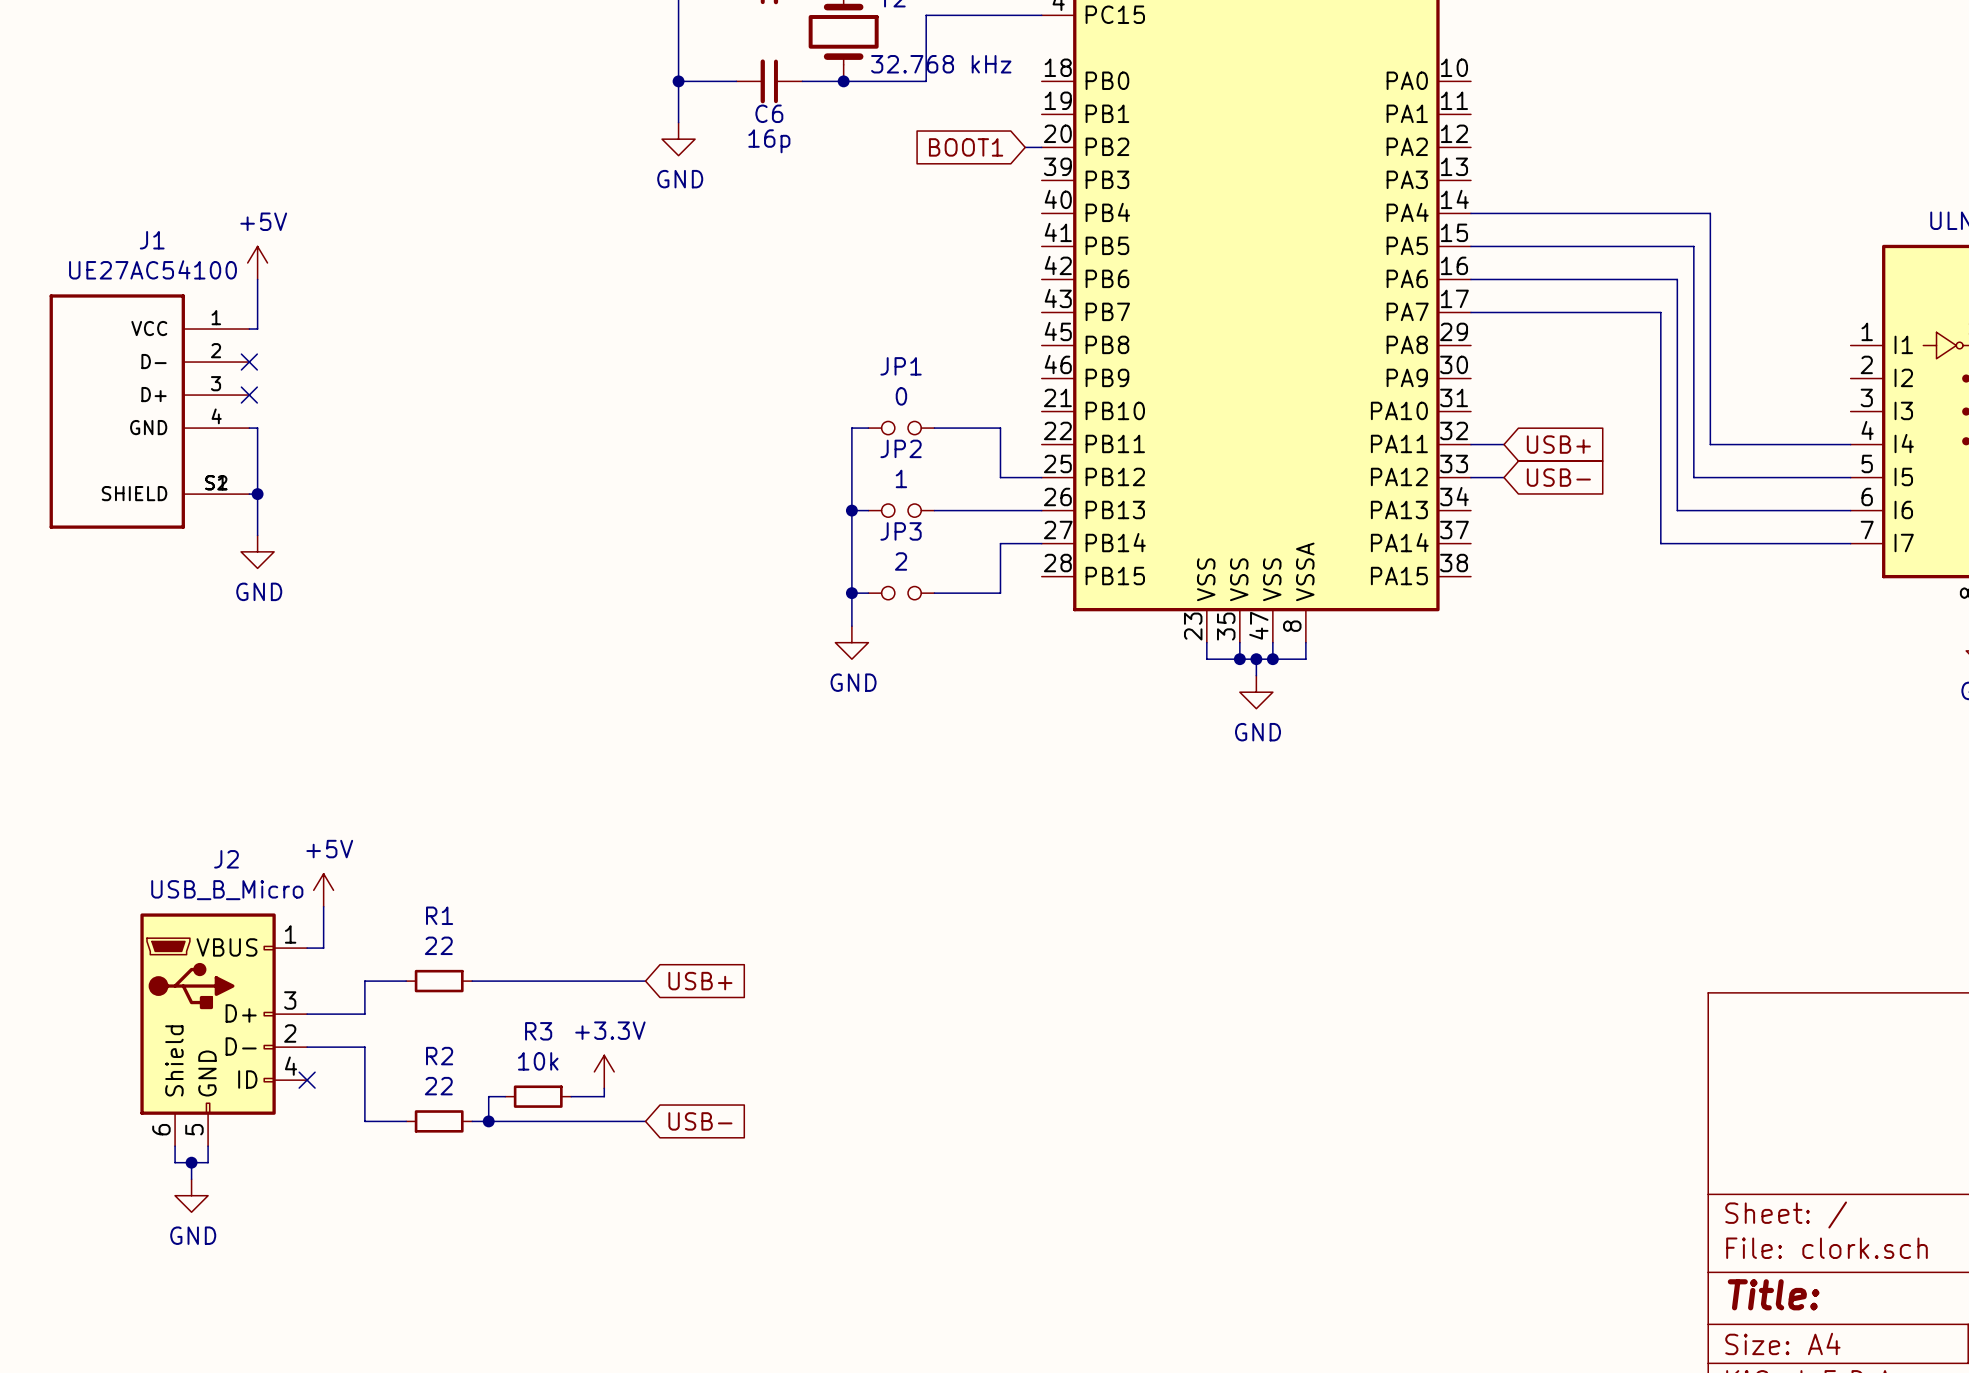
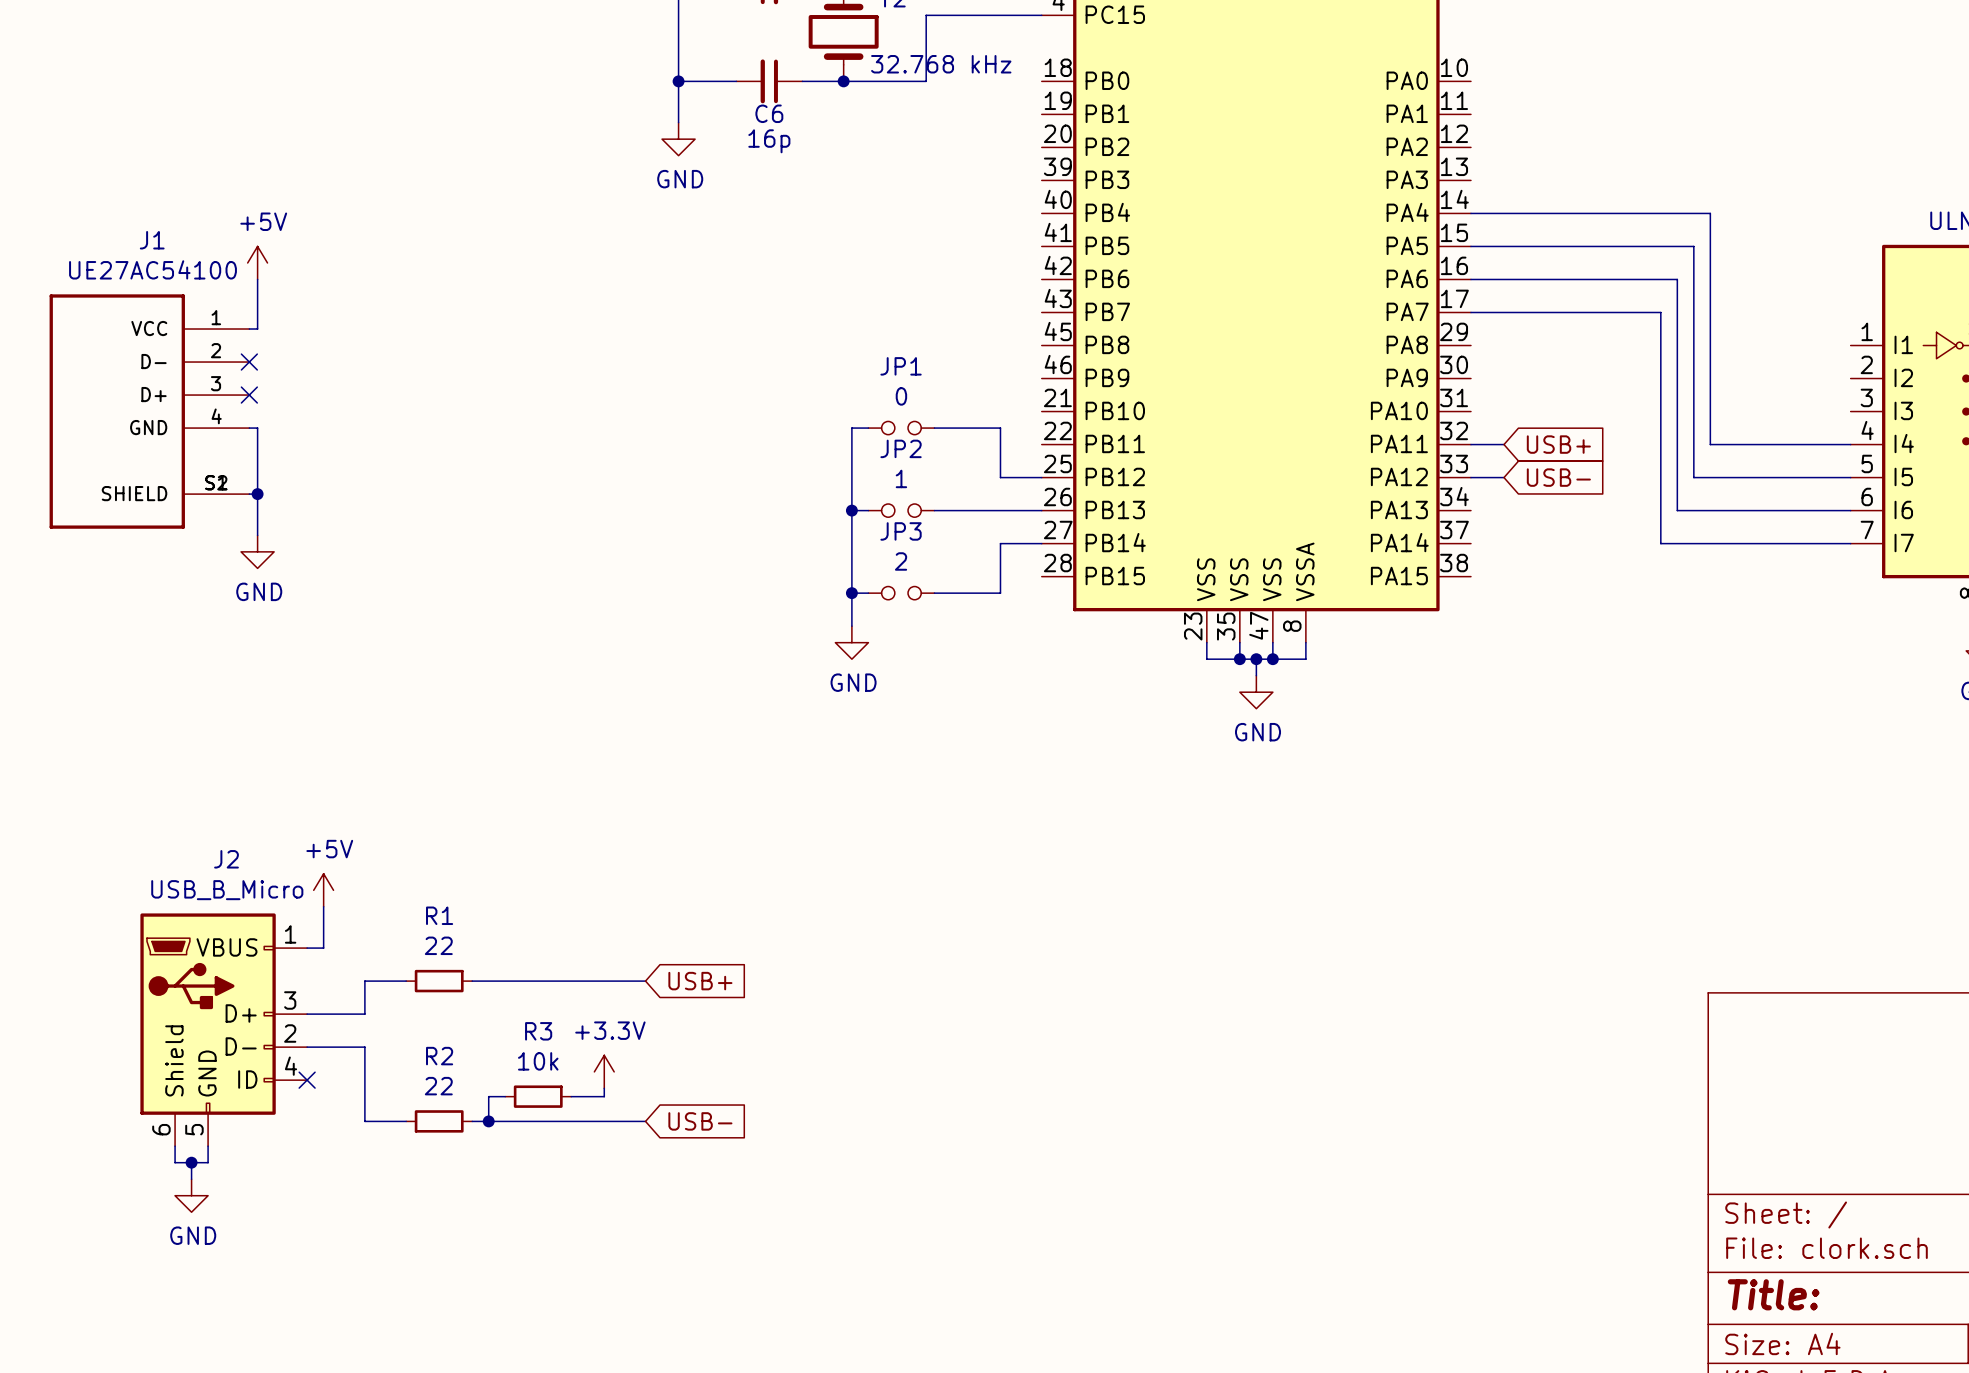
global label: BOOT1 (966, 147) -> none
wire: (1025, 147) (1041, 147) -> none

